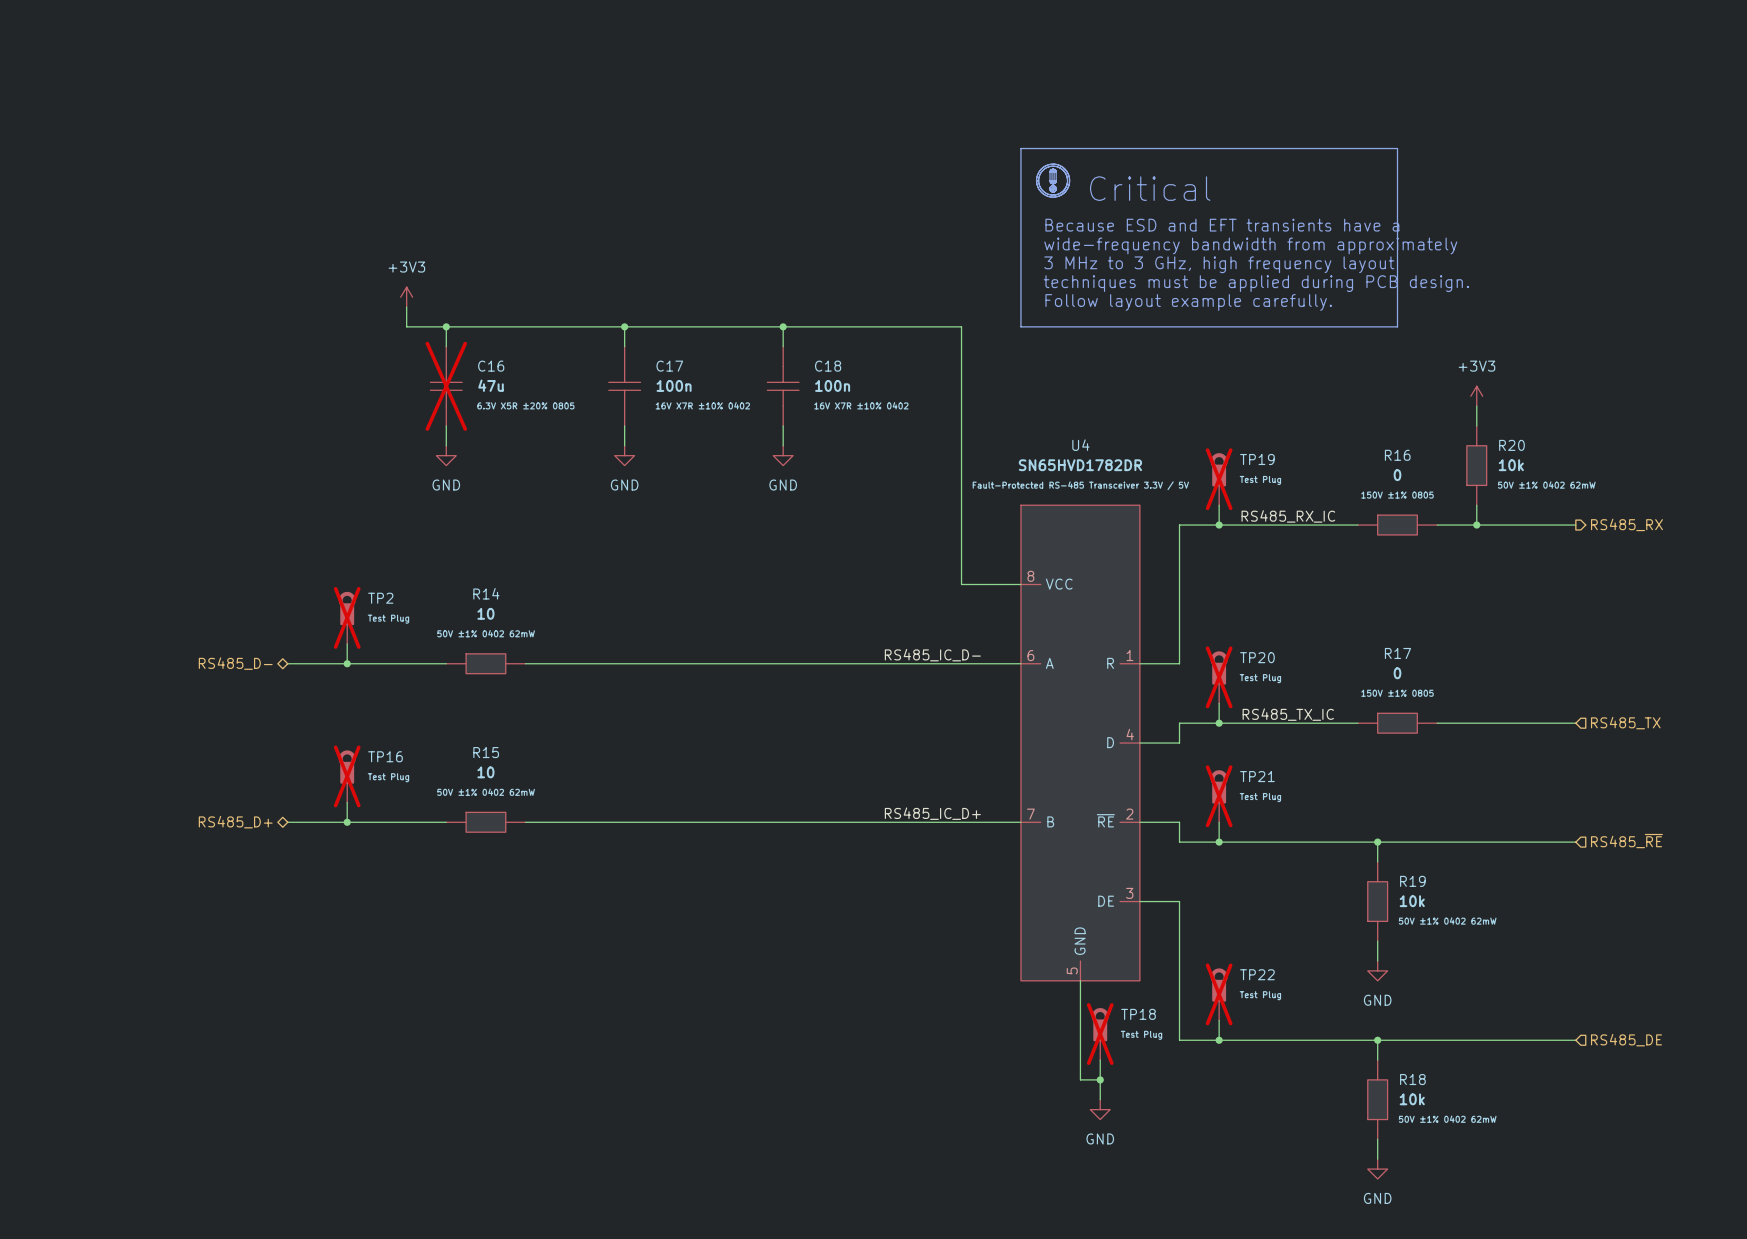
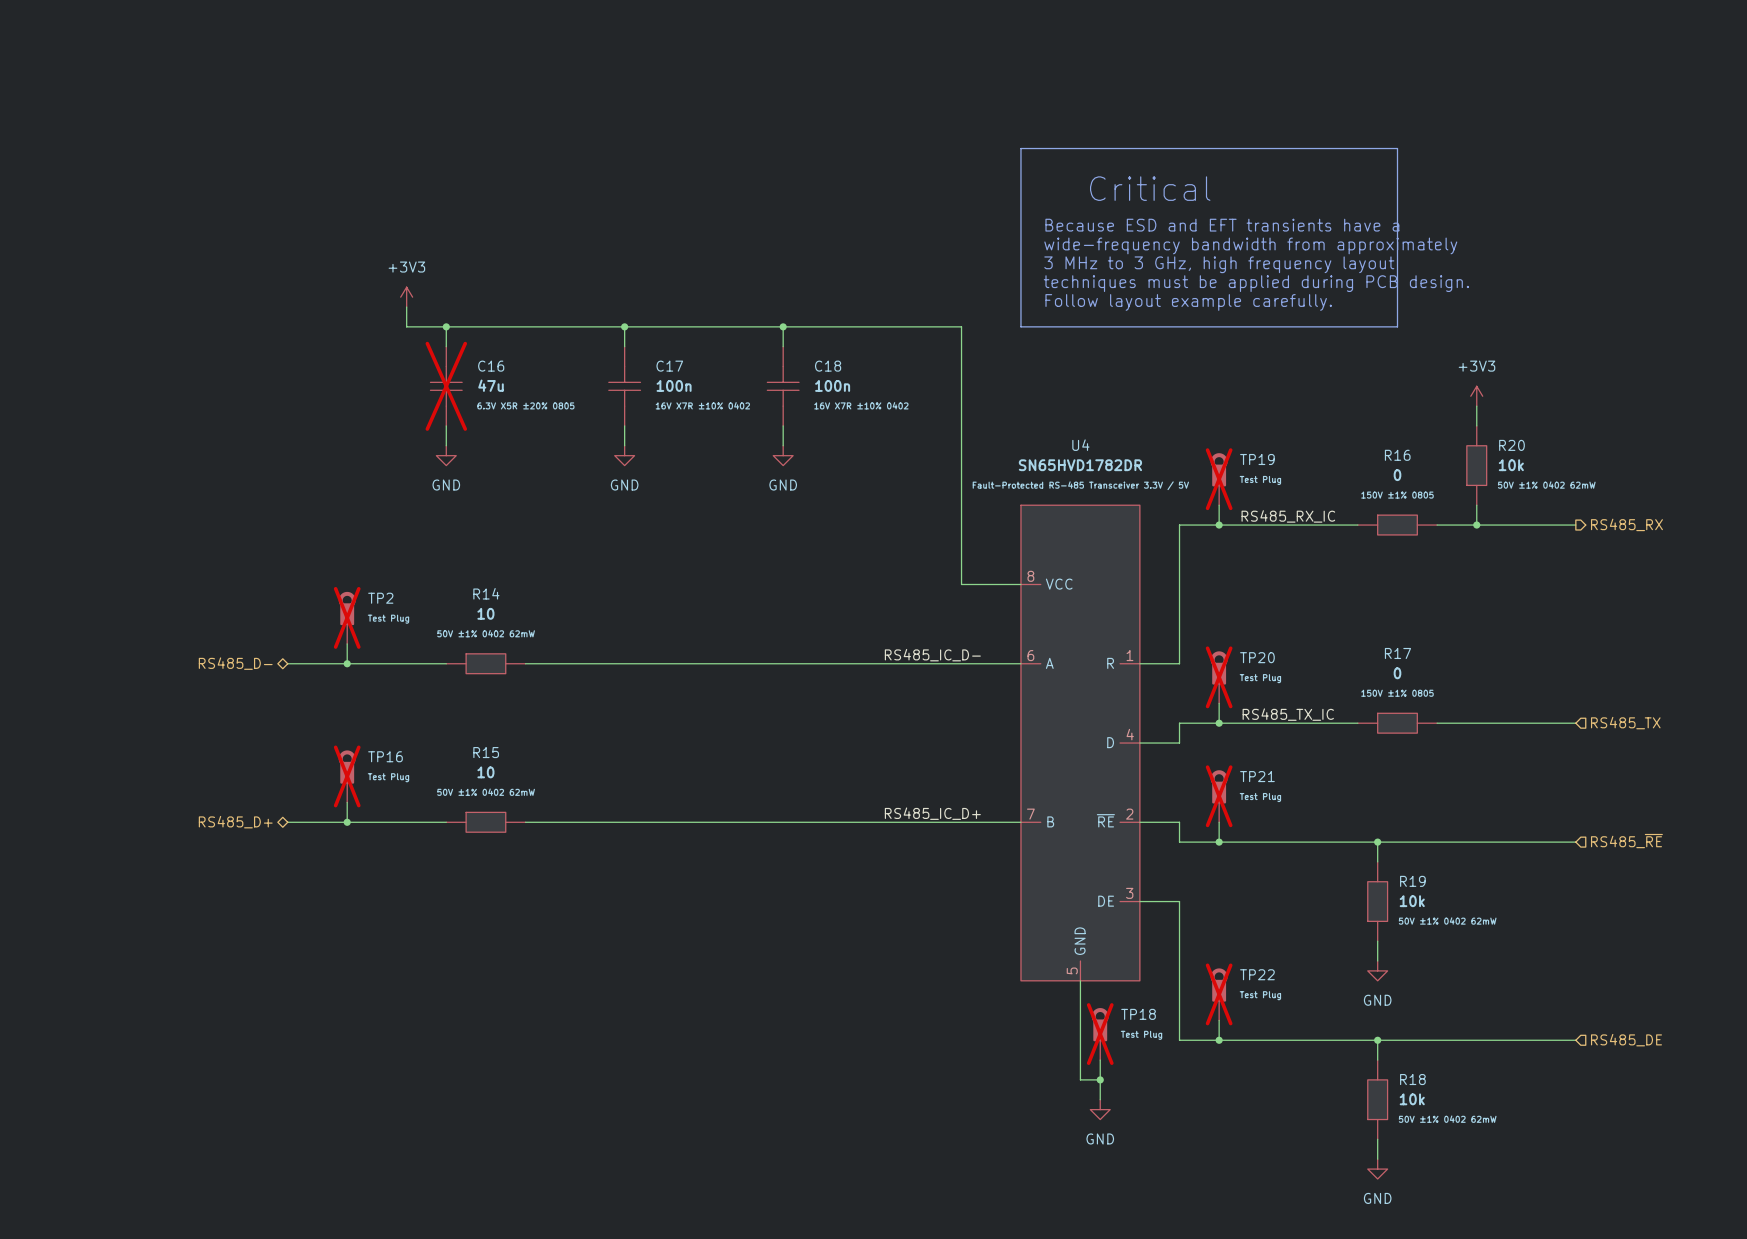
line: (1053, 164) (1041, 169) (1036, 180) (1041, 192) (1053, 197) (1064, 192) (1069, 180) (1064, 168) (1053, 164) -> none
line: (1050, 172) (1050, 180) -> none
line: (1052, 172) (1052, 180) (1050, 180) -> none
line: (1054, 172) (1054, 180) -> none
line: (1056, 172) (1056, 180) -> none
line: (1038, 180) (1043, 191) (1053, 195) (1063, 190) (1067, 180) (1062, 169) (1052, 166) (1042, 170) (1038, 180) -> none
line: (1050, 180) (1051, 183) (1054, 183) -> none
line: (1053, 185) (1050, 187) -> none
line: (1055, 187) (1053, 191) (1050, 188) -> none

